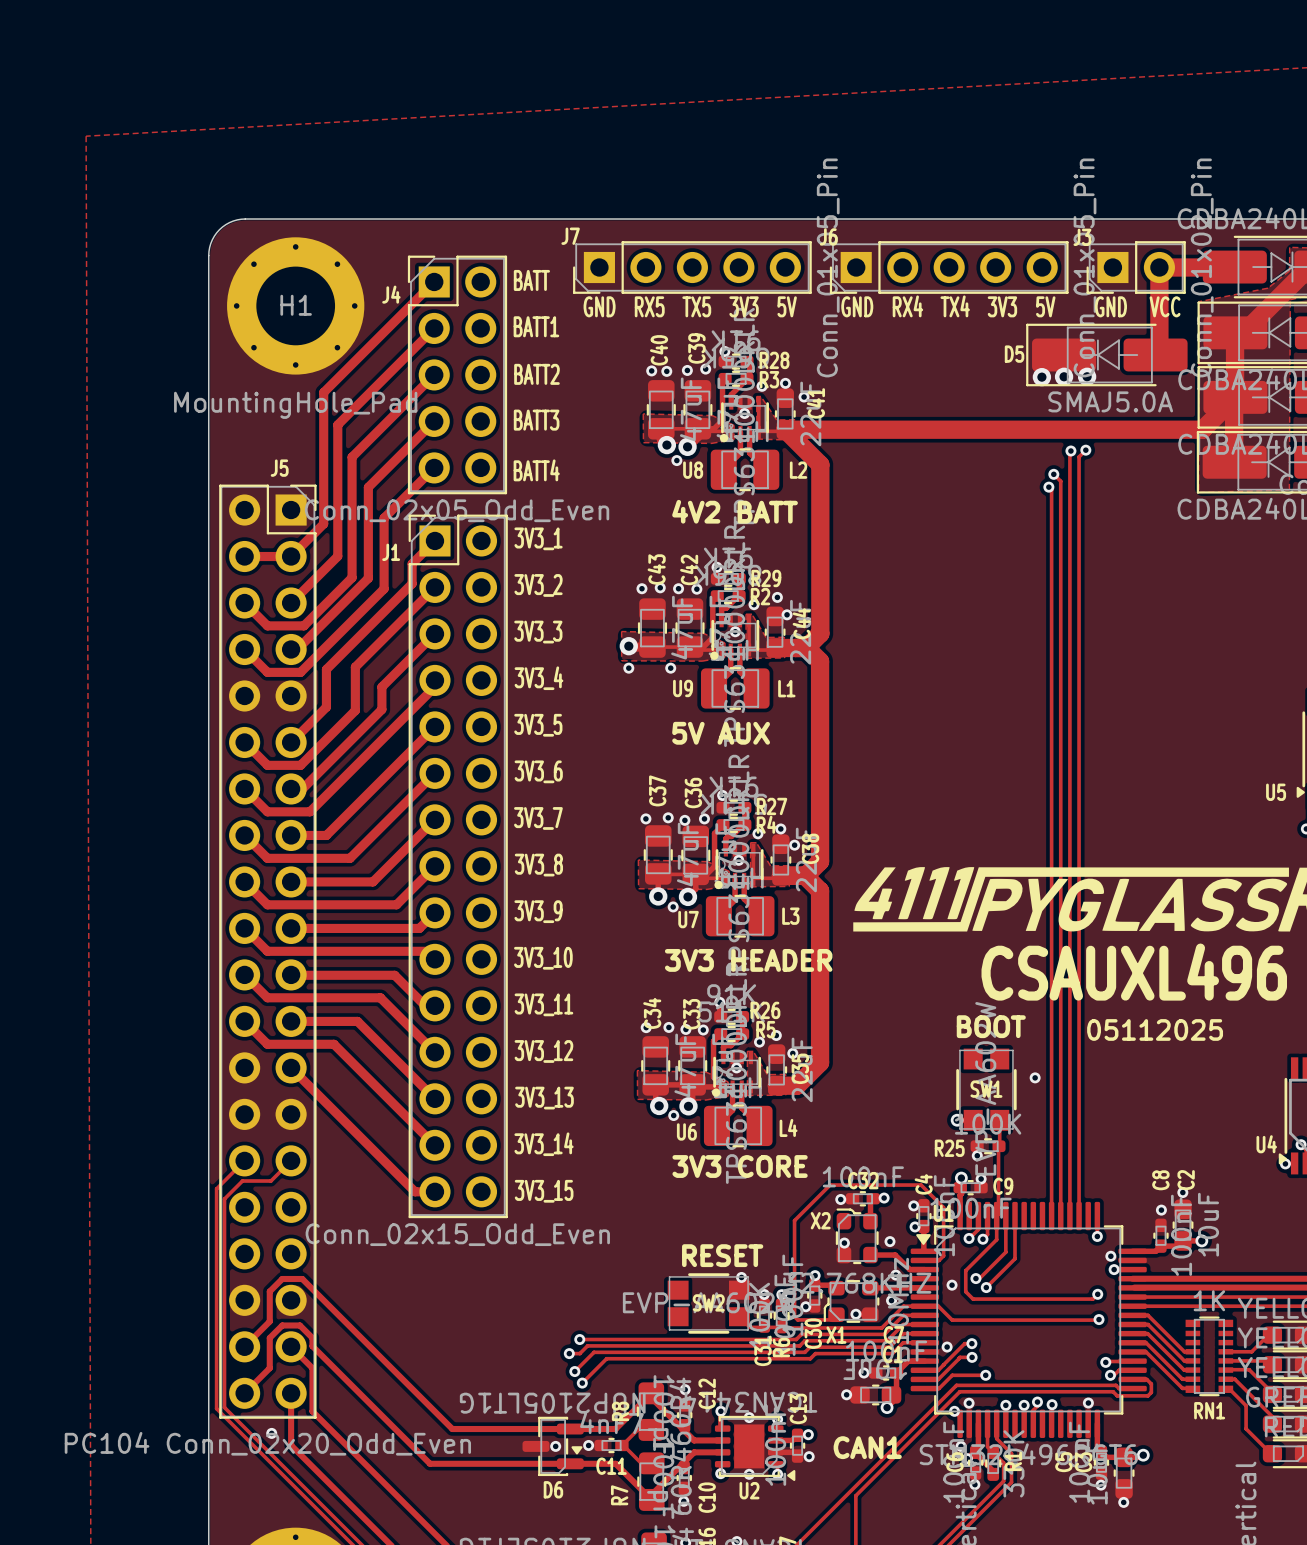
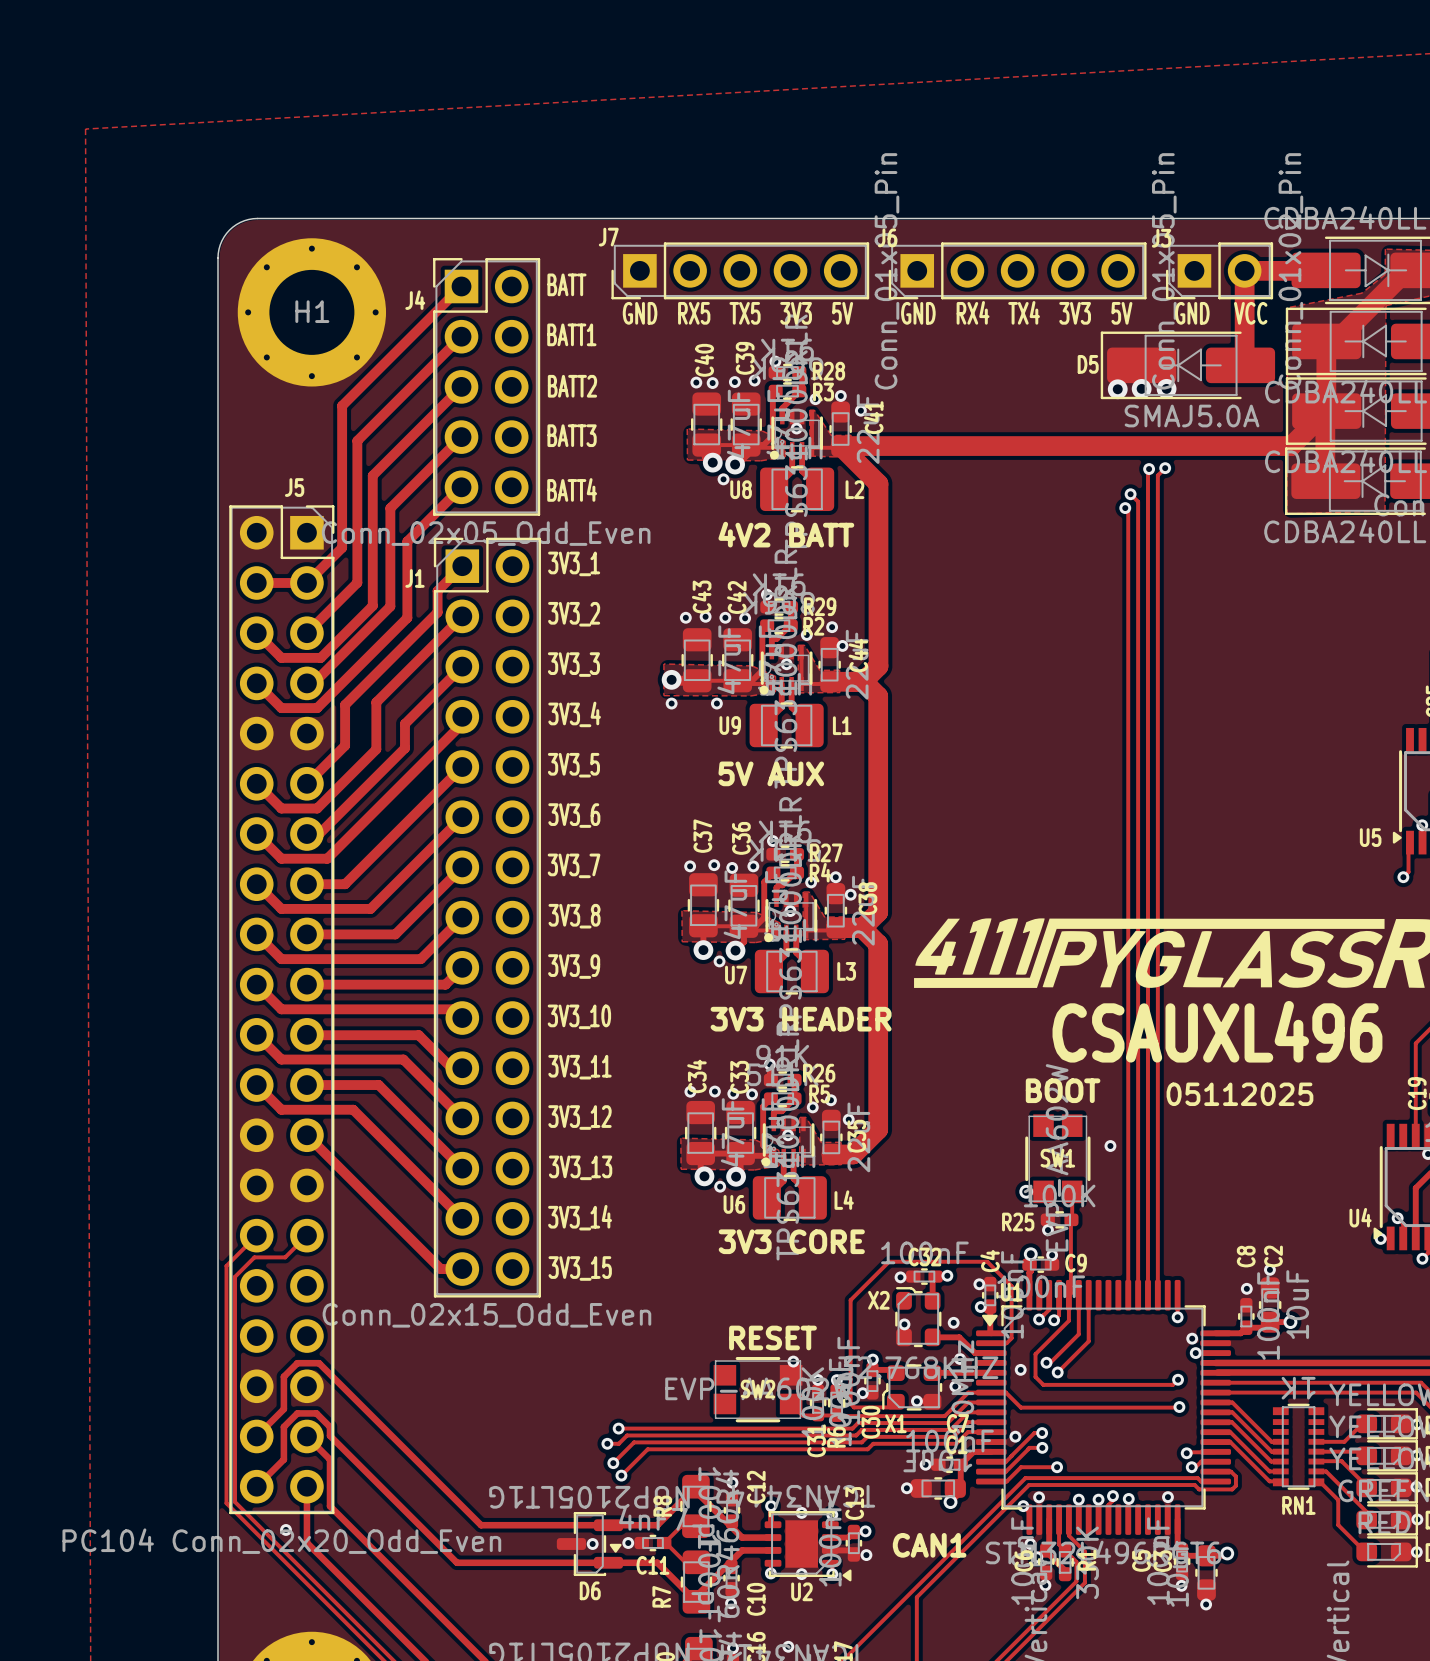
H1 value: MountingHole_Pad (295, 405) -> none
RN1 value rotation: 0° (1209, 1300) -> 180° (1298, 1388)

